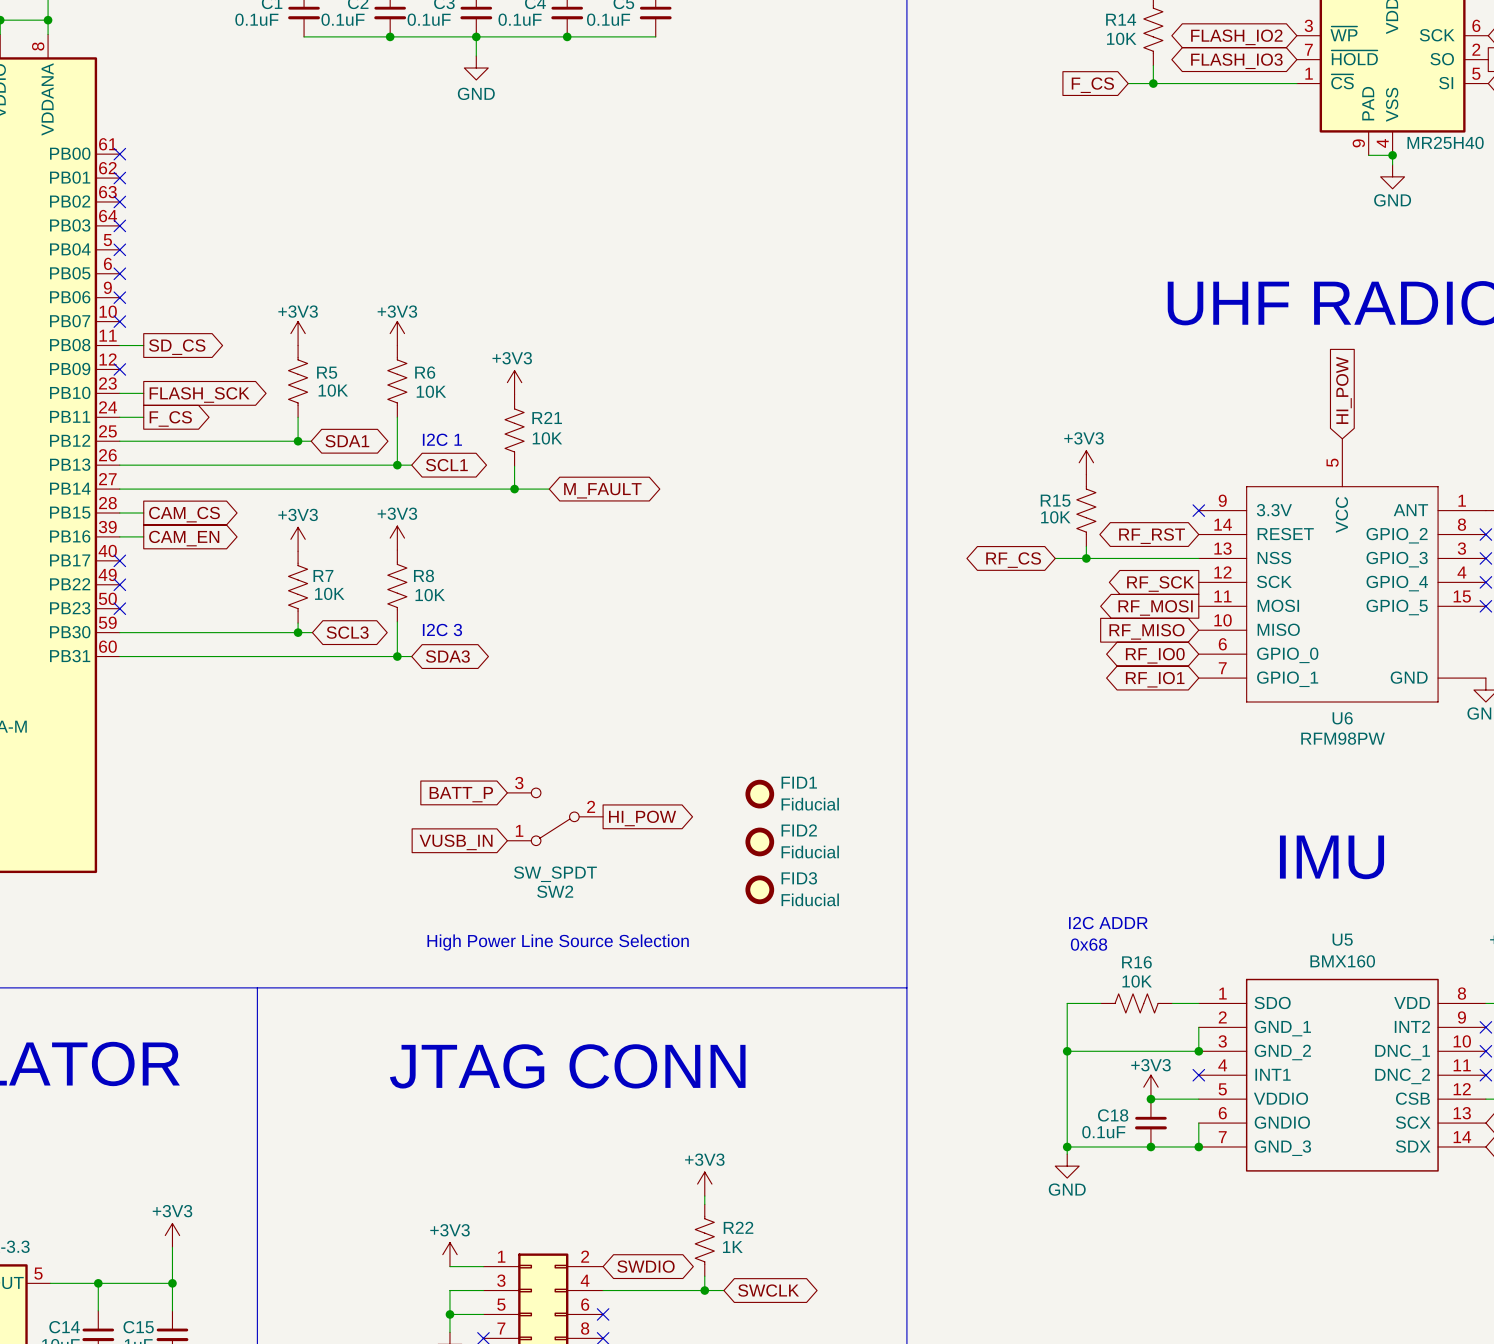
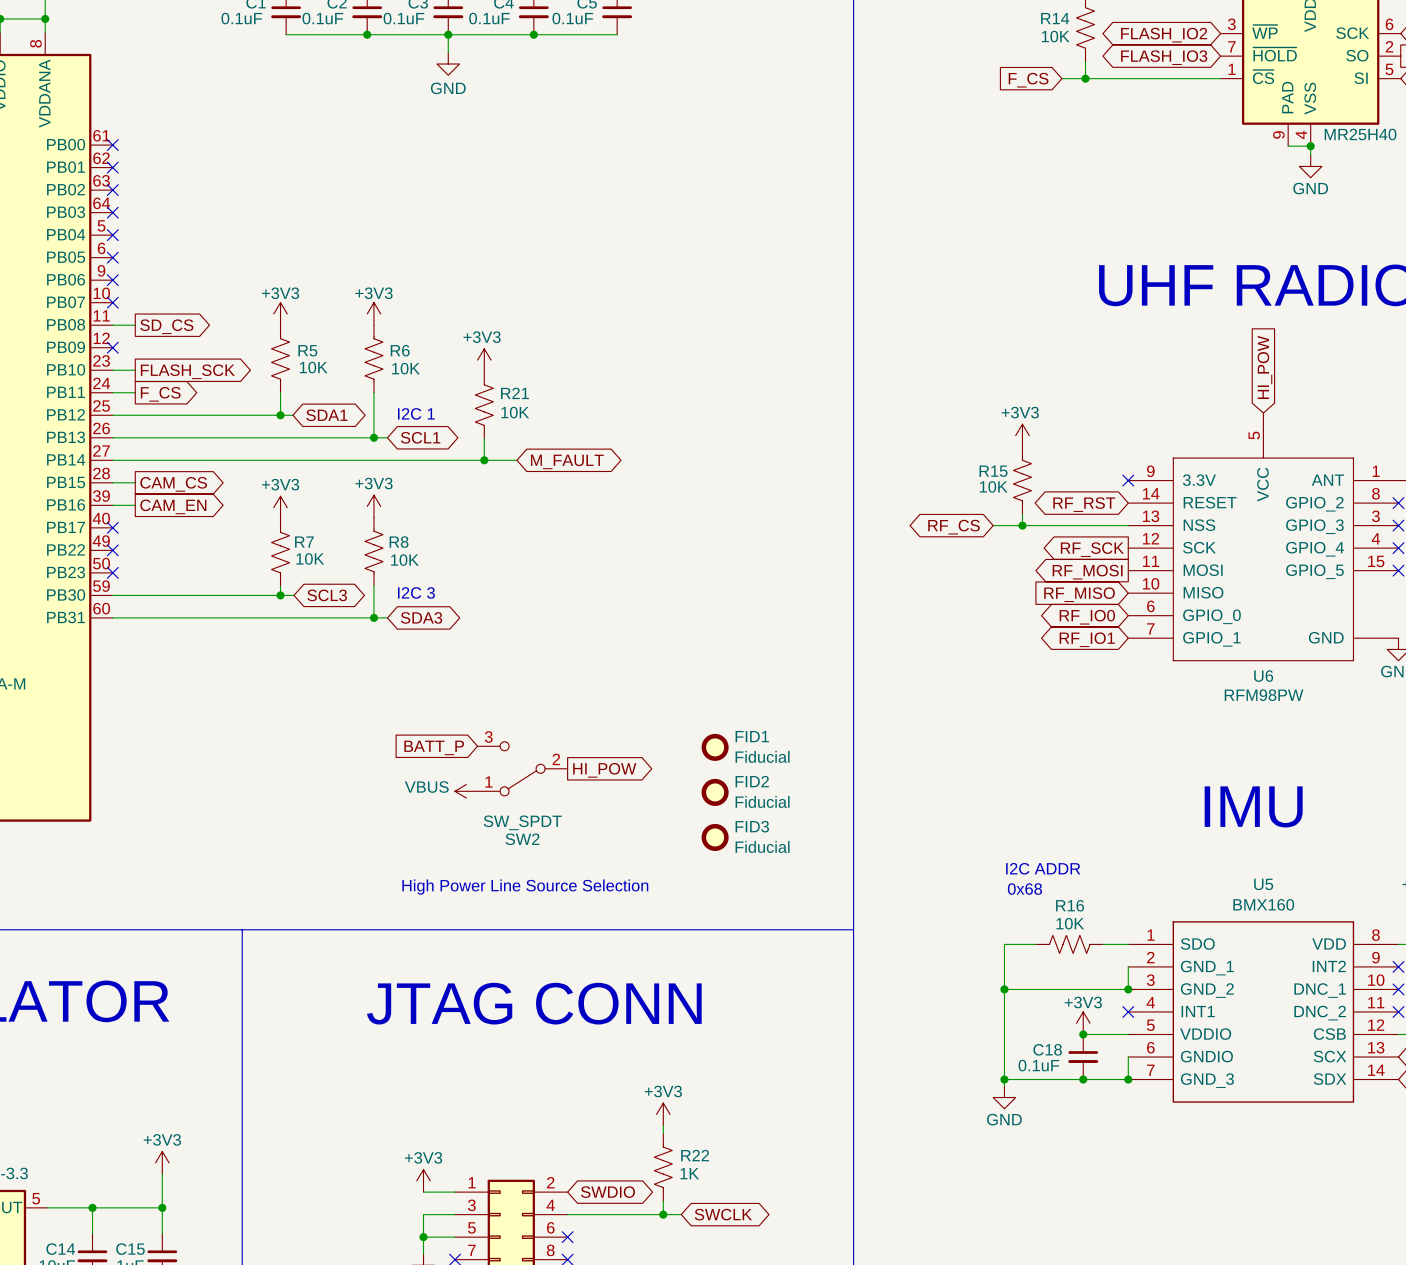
power symbol: none -> VBUS (466, 791)
global label: VUSB_IN (456, 842) -> none

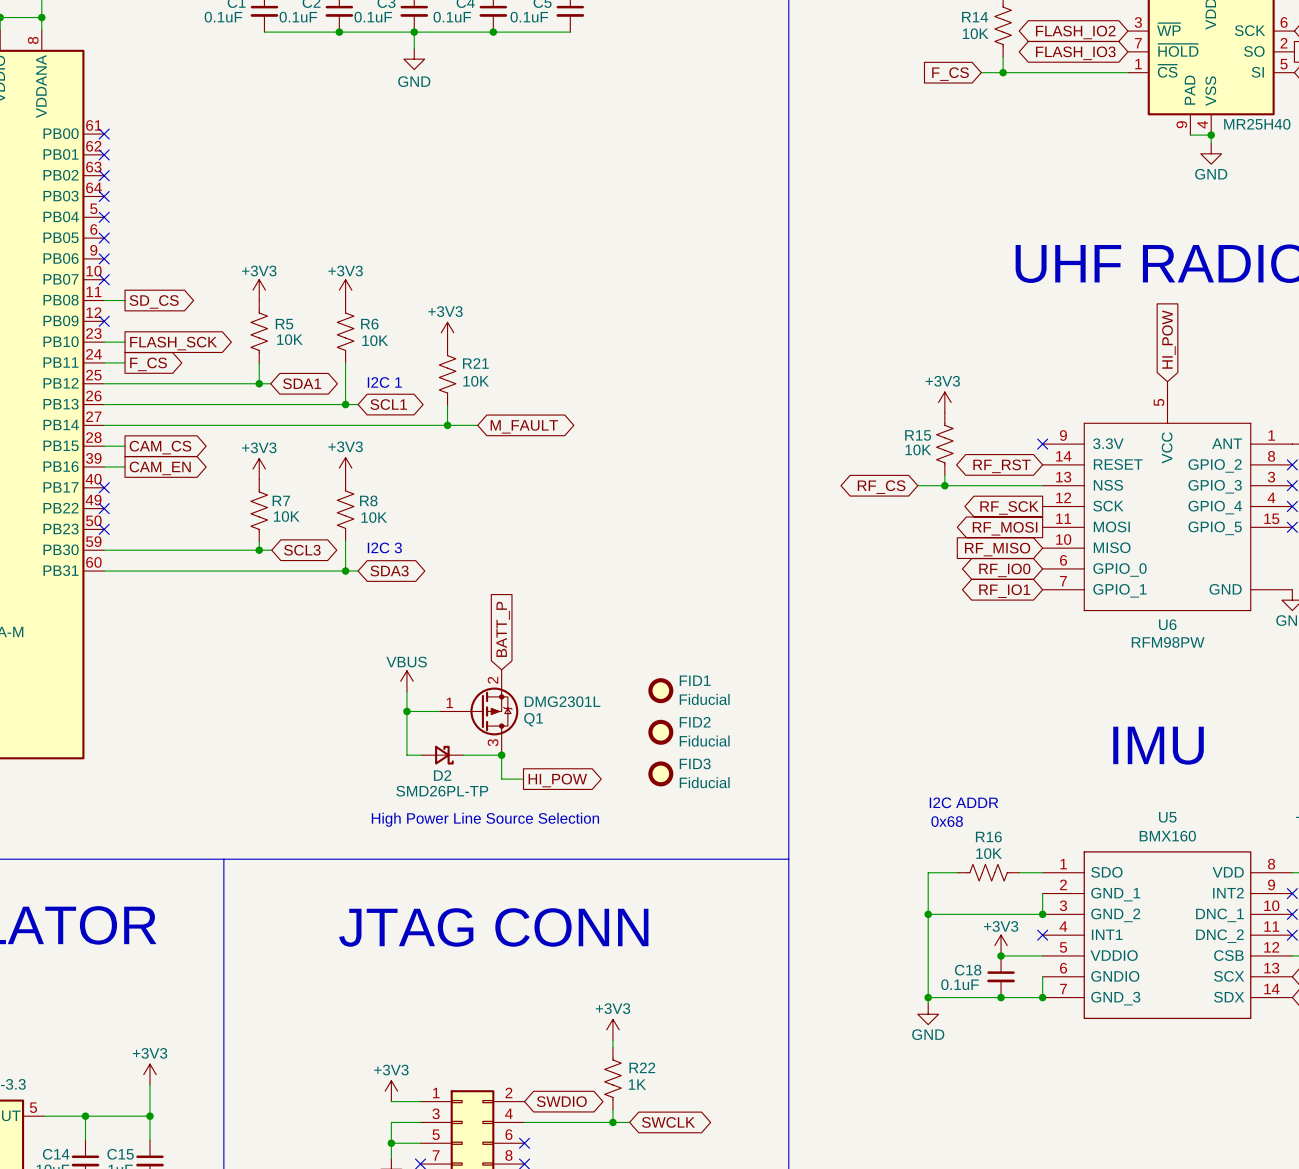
global label rotation: 0° (434, 747) -> 90° clockwise (503, 629)
global label position: BATT_P (434, 747) -> BATT_P (503, 629)
wire: none -> (406, 691) (406, 755) (421, 755)
SW2: SW_SPDT (522, 768) -> none
wire: none -> (406, 711) (439, 711)
junction: none -> (406, 711)
Q1: none -> DMG2301L (478, 711)
global label position: HI_POW (604, 770) -> HI_POW (557, 780)
power symbol text position: VBUS (426, 787) -> VBUS (406, 662)
power symbol rotation: 0° (466, 791) -> 90° clockwise (406, 681)
power symbol position: VBUS (466, 791) -> VBUS (406, 681)
wire: none -> (501, 753) (501, 779) (523, 779)
D2: none -> SMD26PL-TP (442, 755)
wire: none -> (463, 755) (501, 755)
junction: none -> (501, 755)

